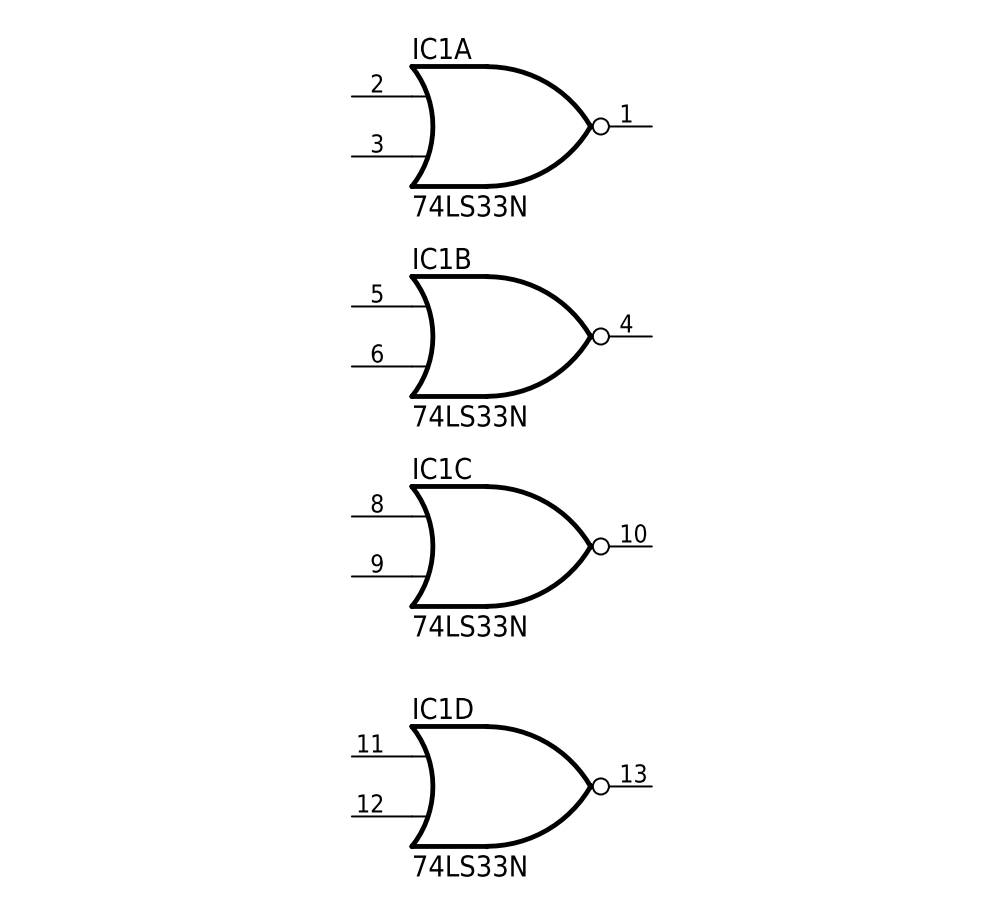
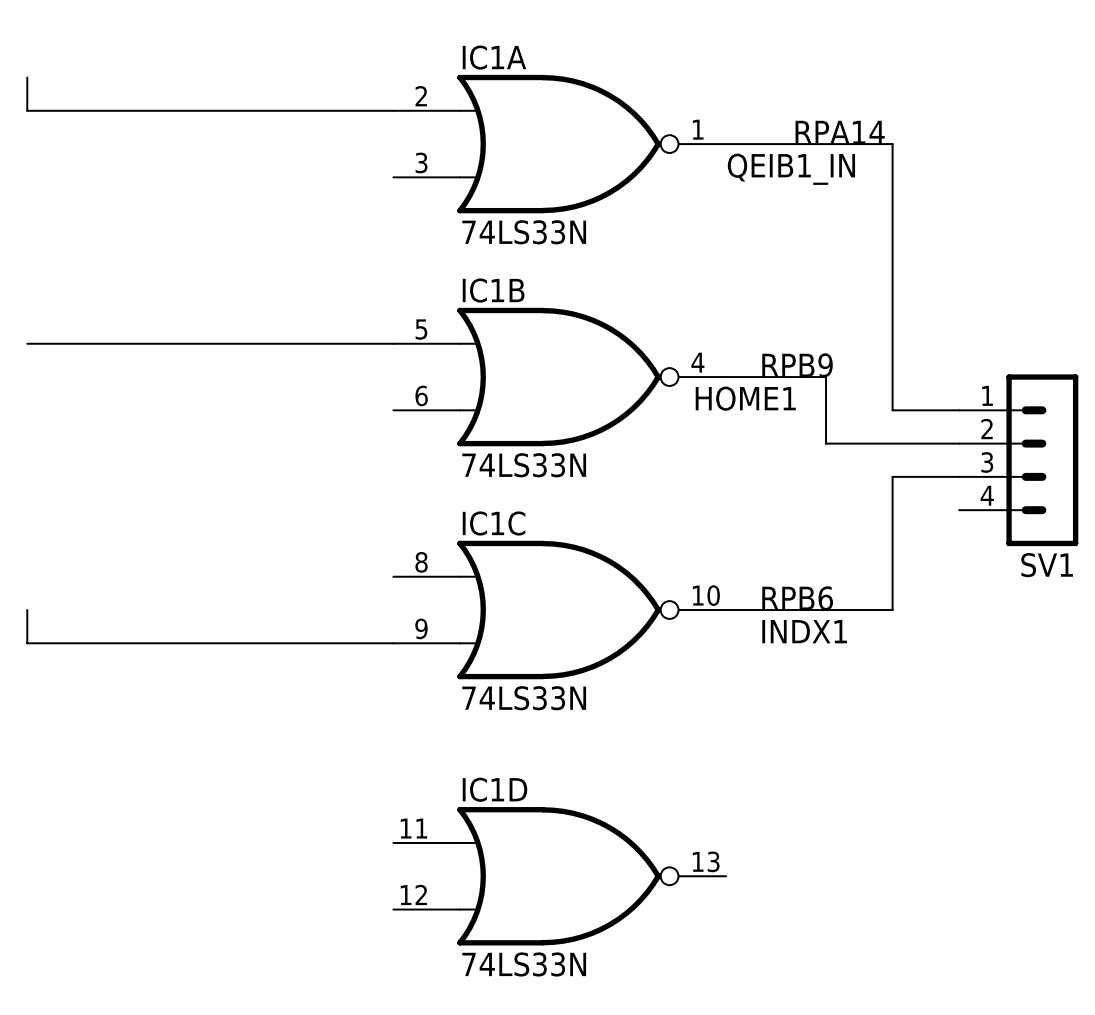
wire: none -> (27, 77) (27, 110) (393, 110)
text: none -> RPA14 (840, 132)
wire: none -> (726, 144) (892, 144) (892, 410) (959, 410)
text: none -> QEIB1_IN (791, 169)
wire: none -> (27, 343) (393, 343)
text: none -> RPB9 (797, 365)
wire: none -> (726, 377) (826, 377) (826, 443) (959, 443)
text: none -> HOME1 (745, 398)
SV1: none -> (1018, 460)
wire: none -> (959, 476) (892, 476) (892, 610) (726, 610)
text: none -> RPB6 (797, 598)
wire: none -> (27, 610) (27, 643) (393, 643)
text: none -> INDX1 (804, 631)

